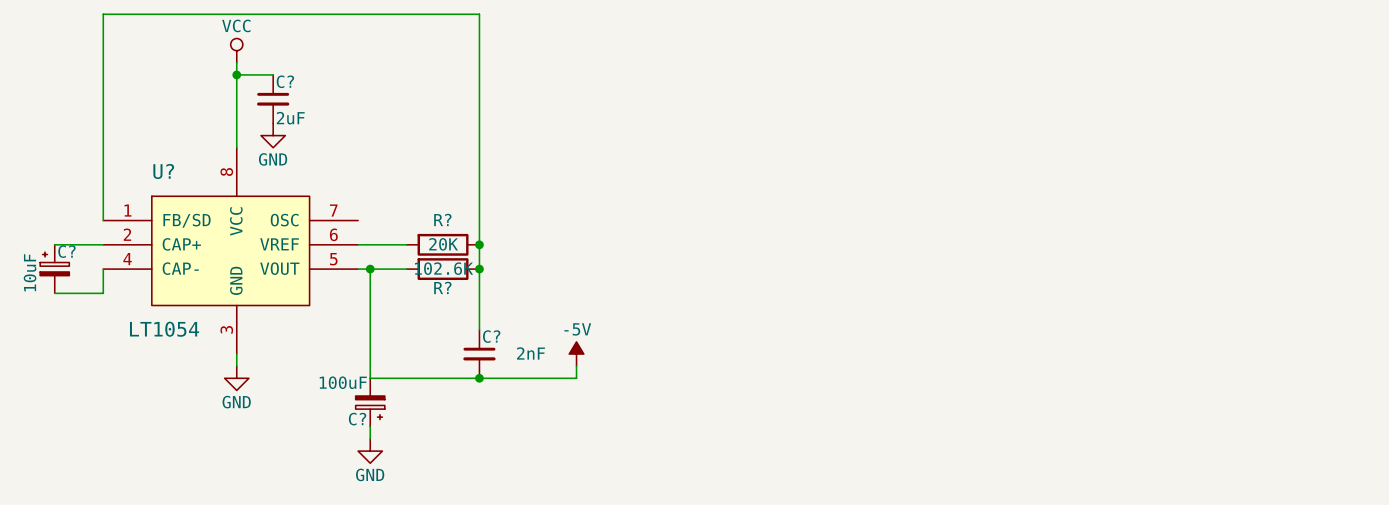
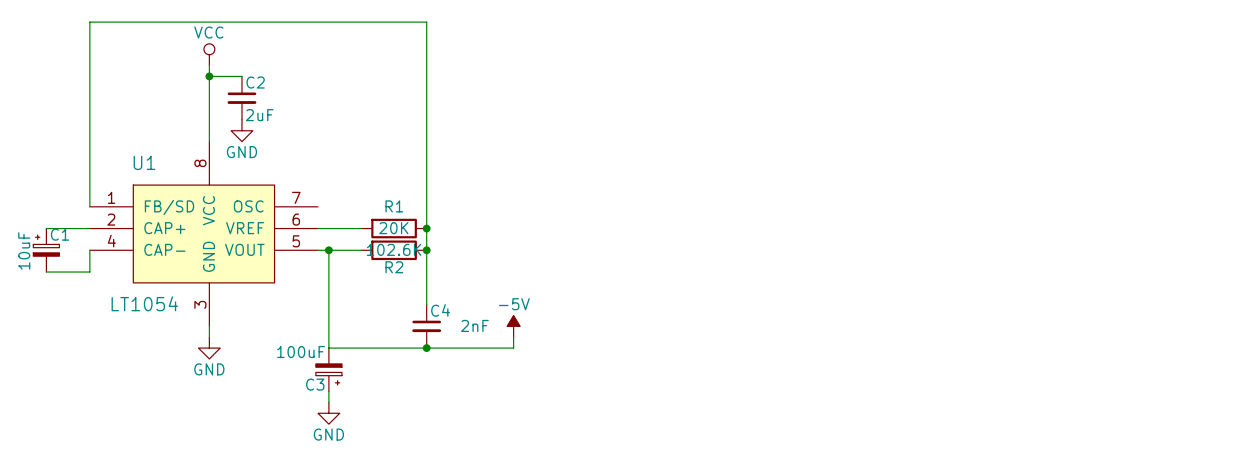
C? name: C? (285, 81) -> C2 (255, 82)
U? name: U? (163, 171) -> U1 (144, 162)
R? name: R? (442, 219) -> R1 (394, 206)
C? name: C? (66, 251) -> C1 (60, 234)
R? name: R? (442, 287) -> R2 (394, 267)
C? name: C? (491, 336) -> C4 (440, 310)
C? name: C? (357, 419) -> C3 (315, 384)

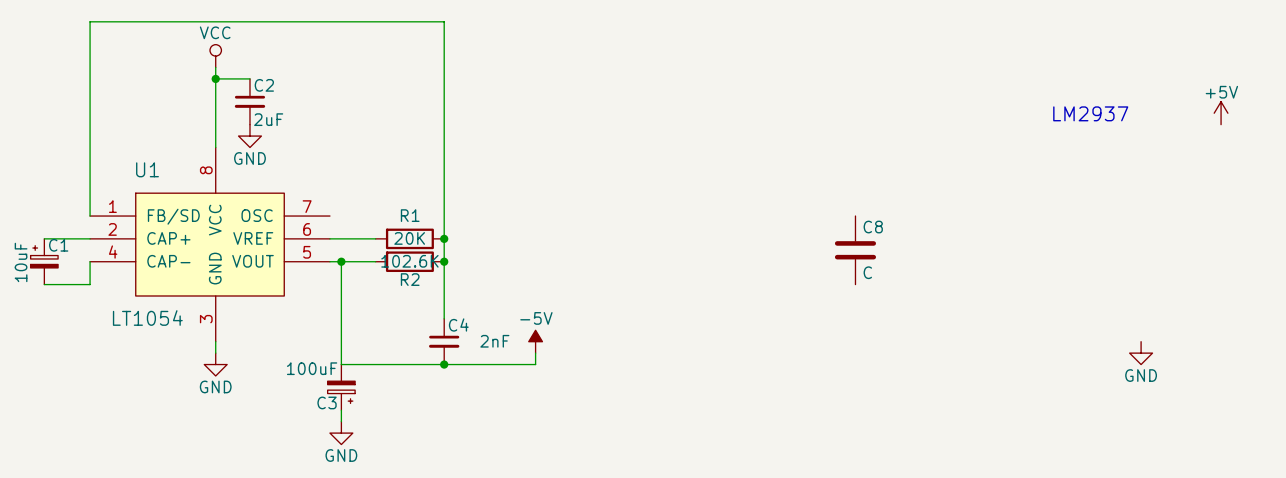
text: none -> LM2937 (1090, 113)
power symbol: none -> +5V (1221, 113)
C8: none -> C (855, 250)
power symbol: none -> GND (1141, 353)

